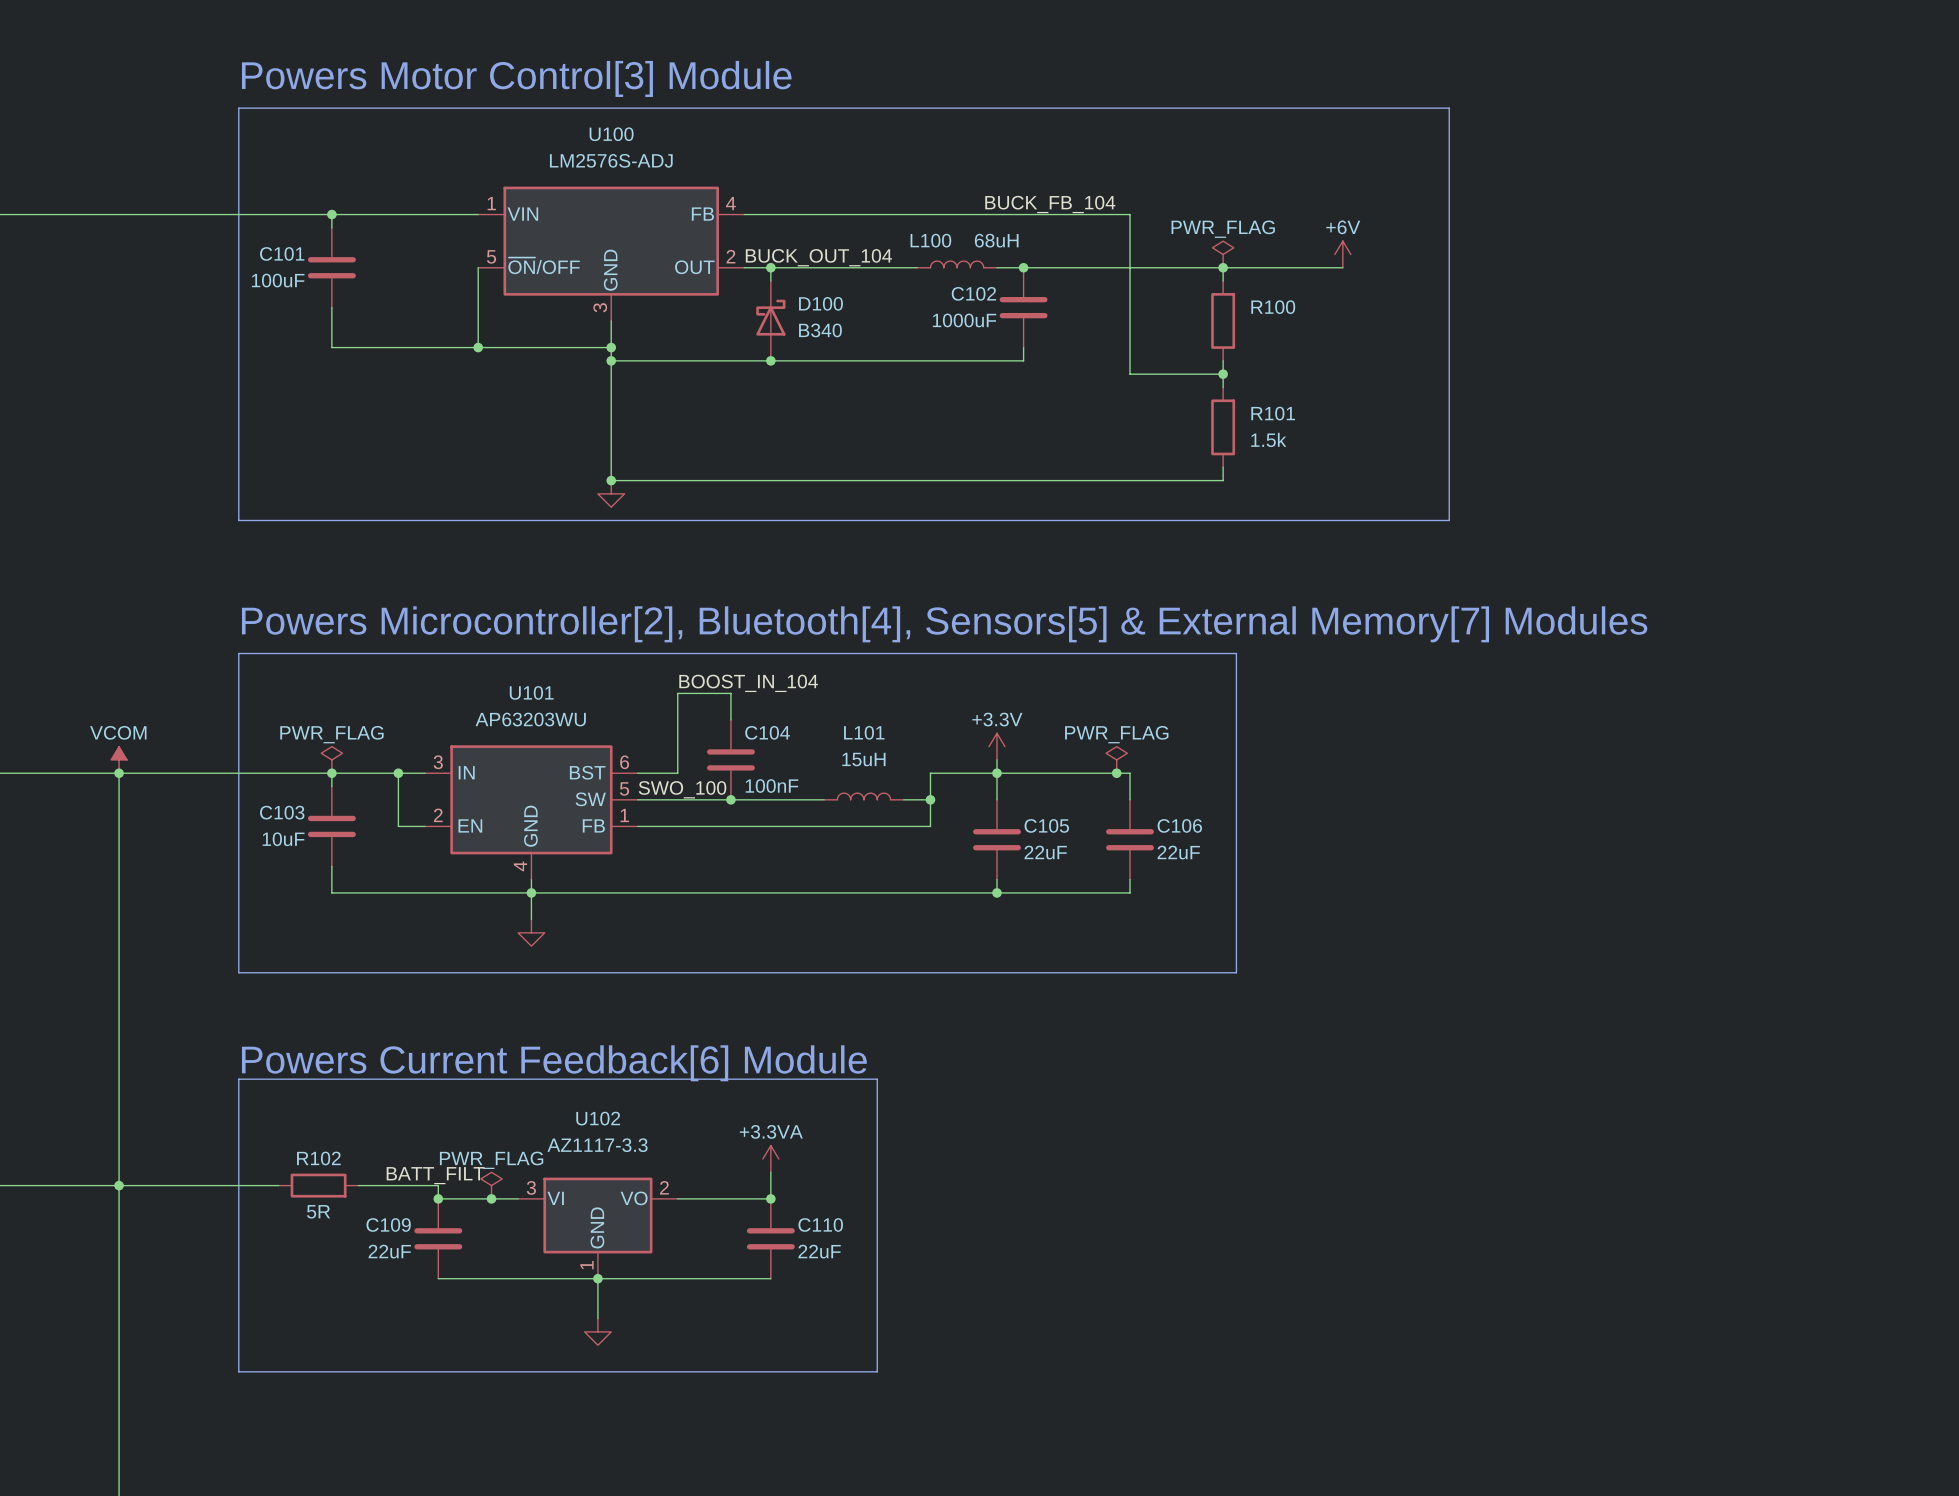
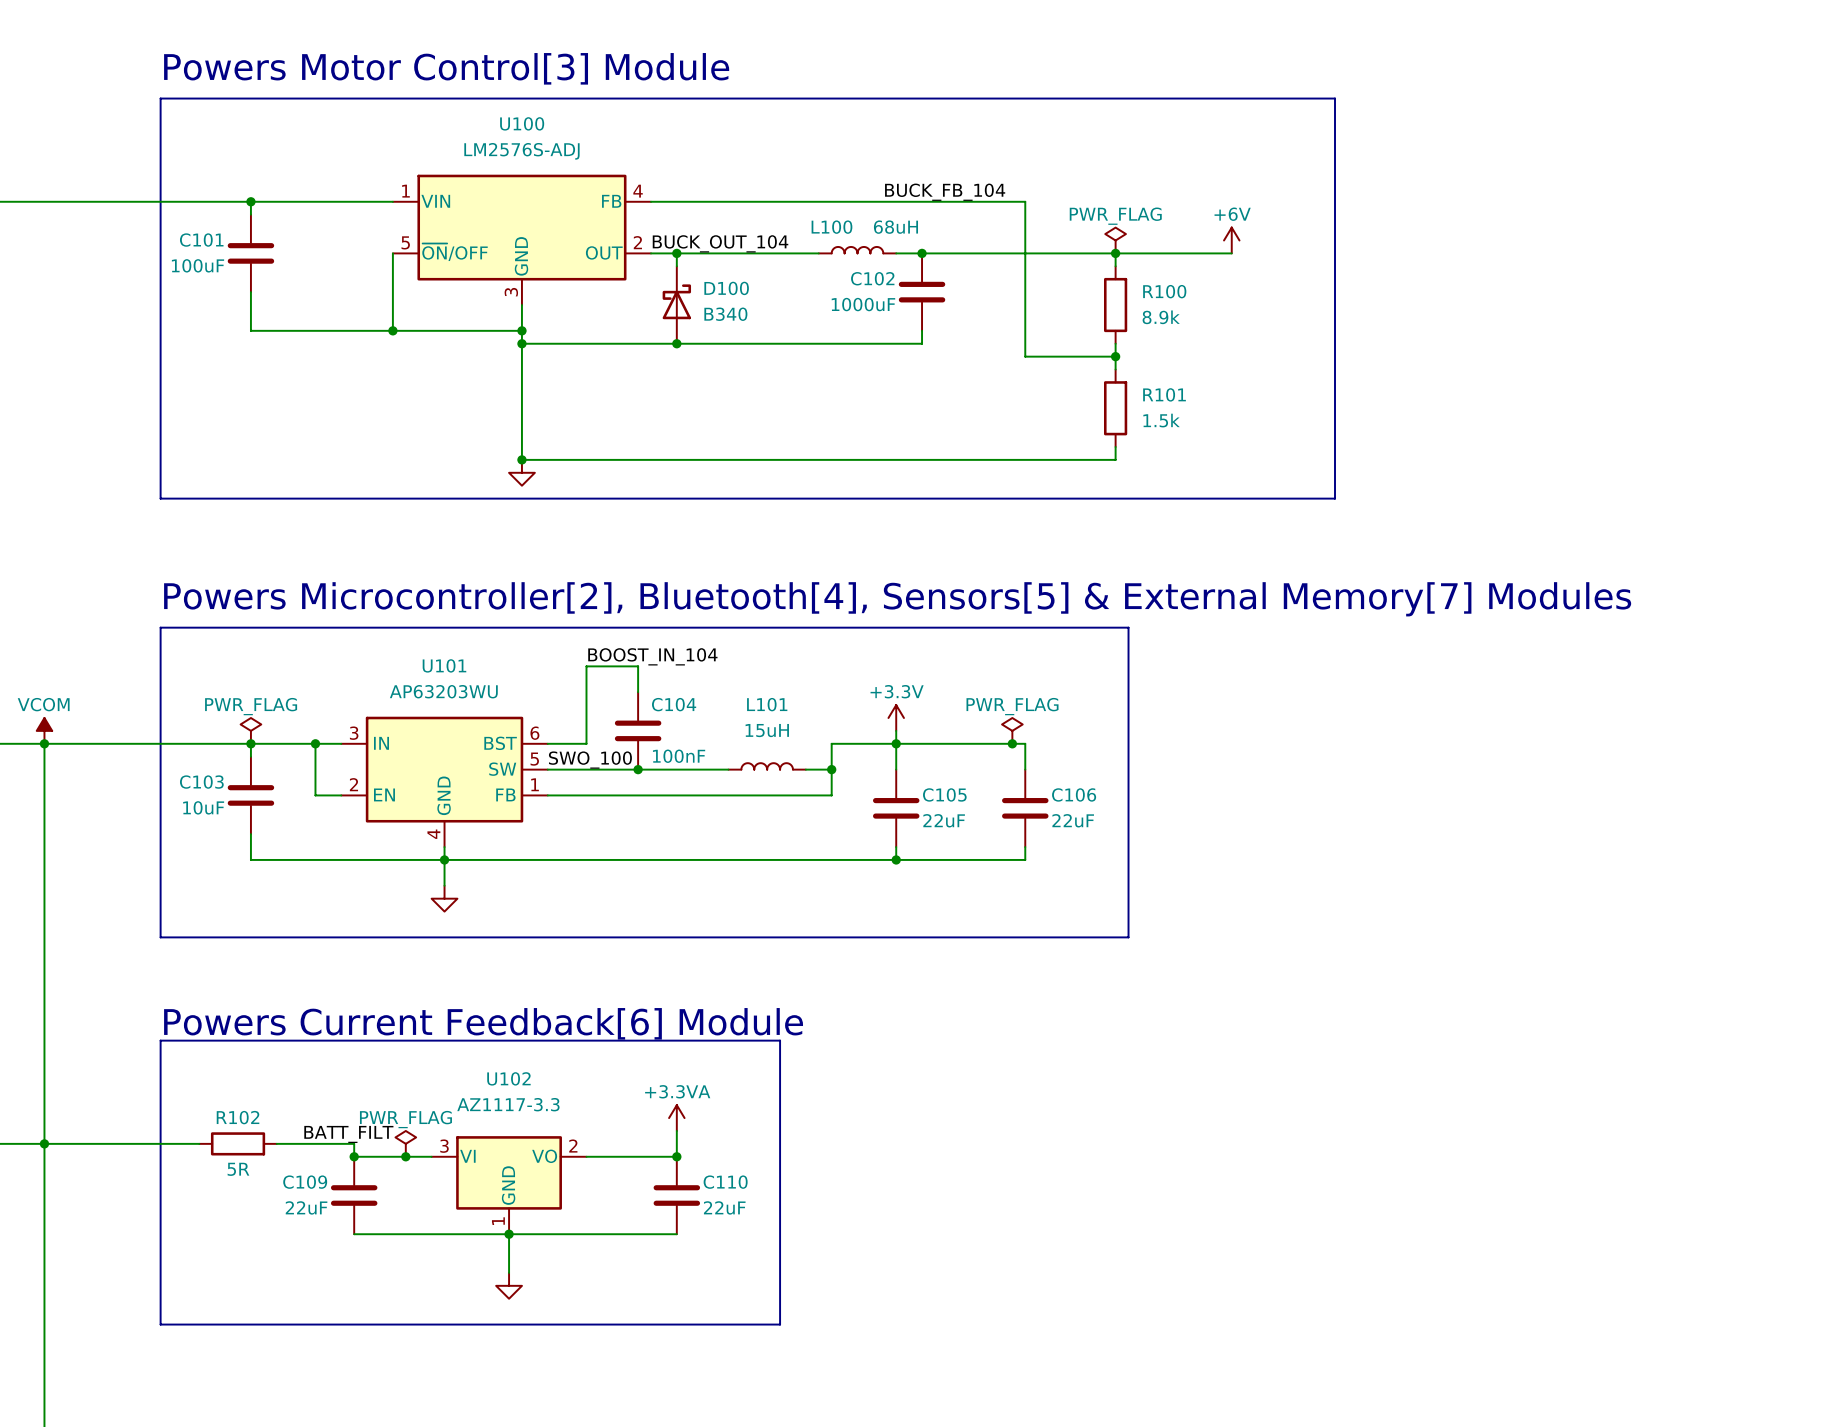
R100 value: none -> 8.9k (1161, 317)

